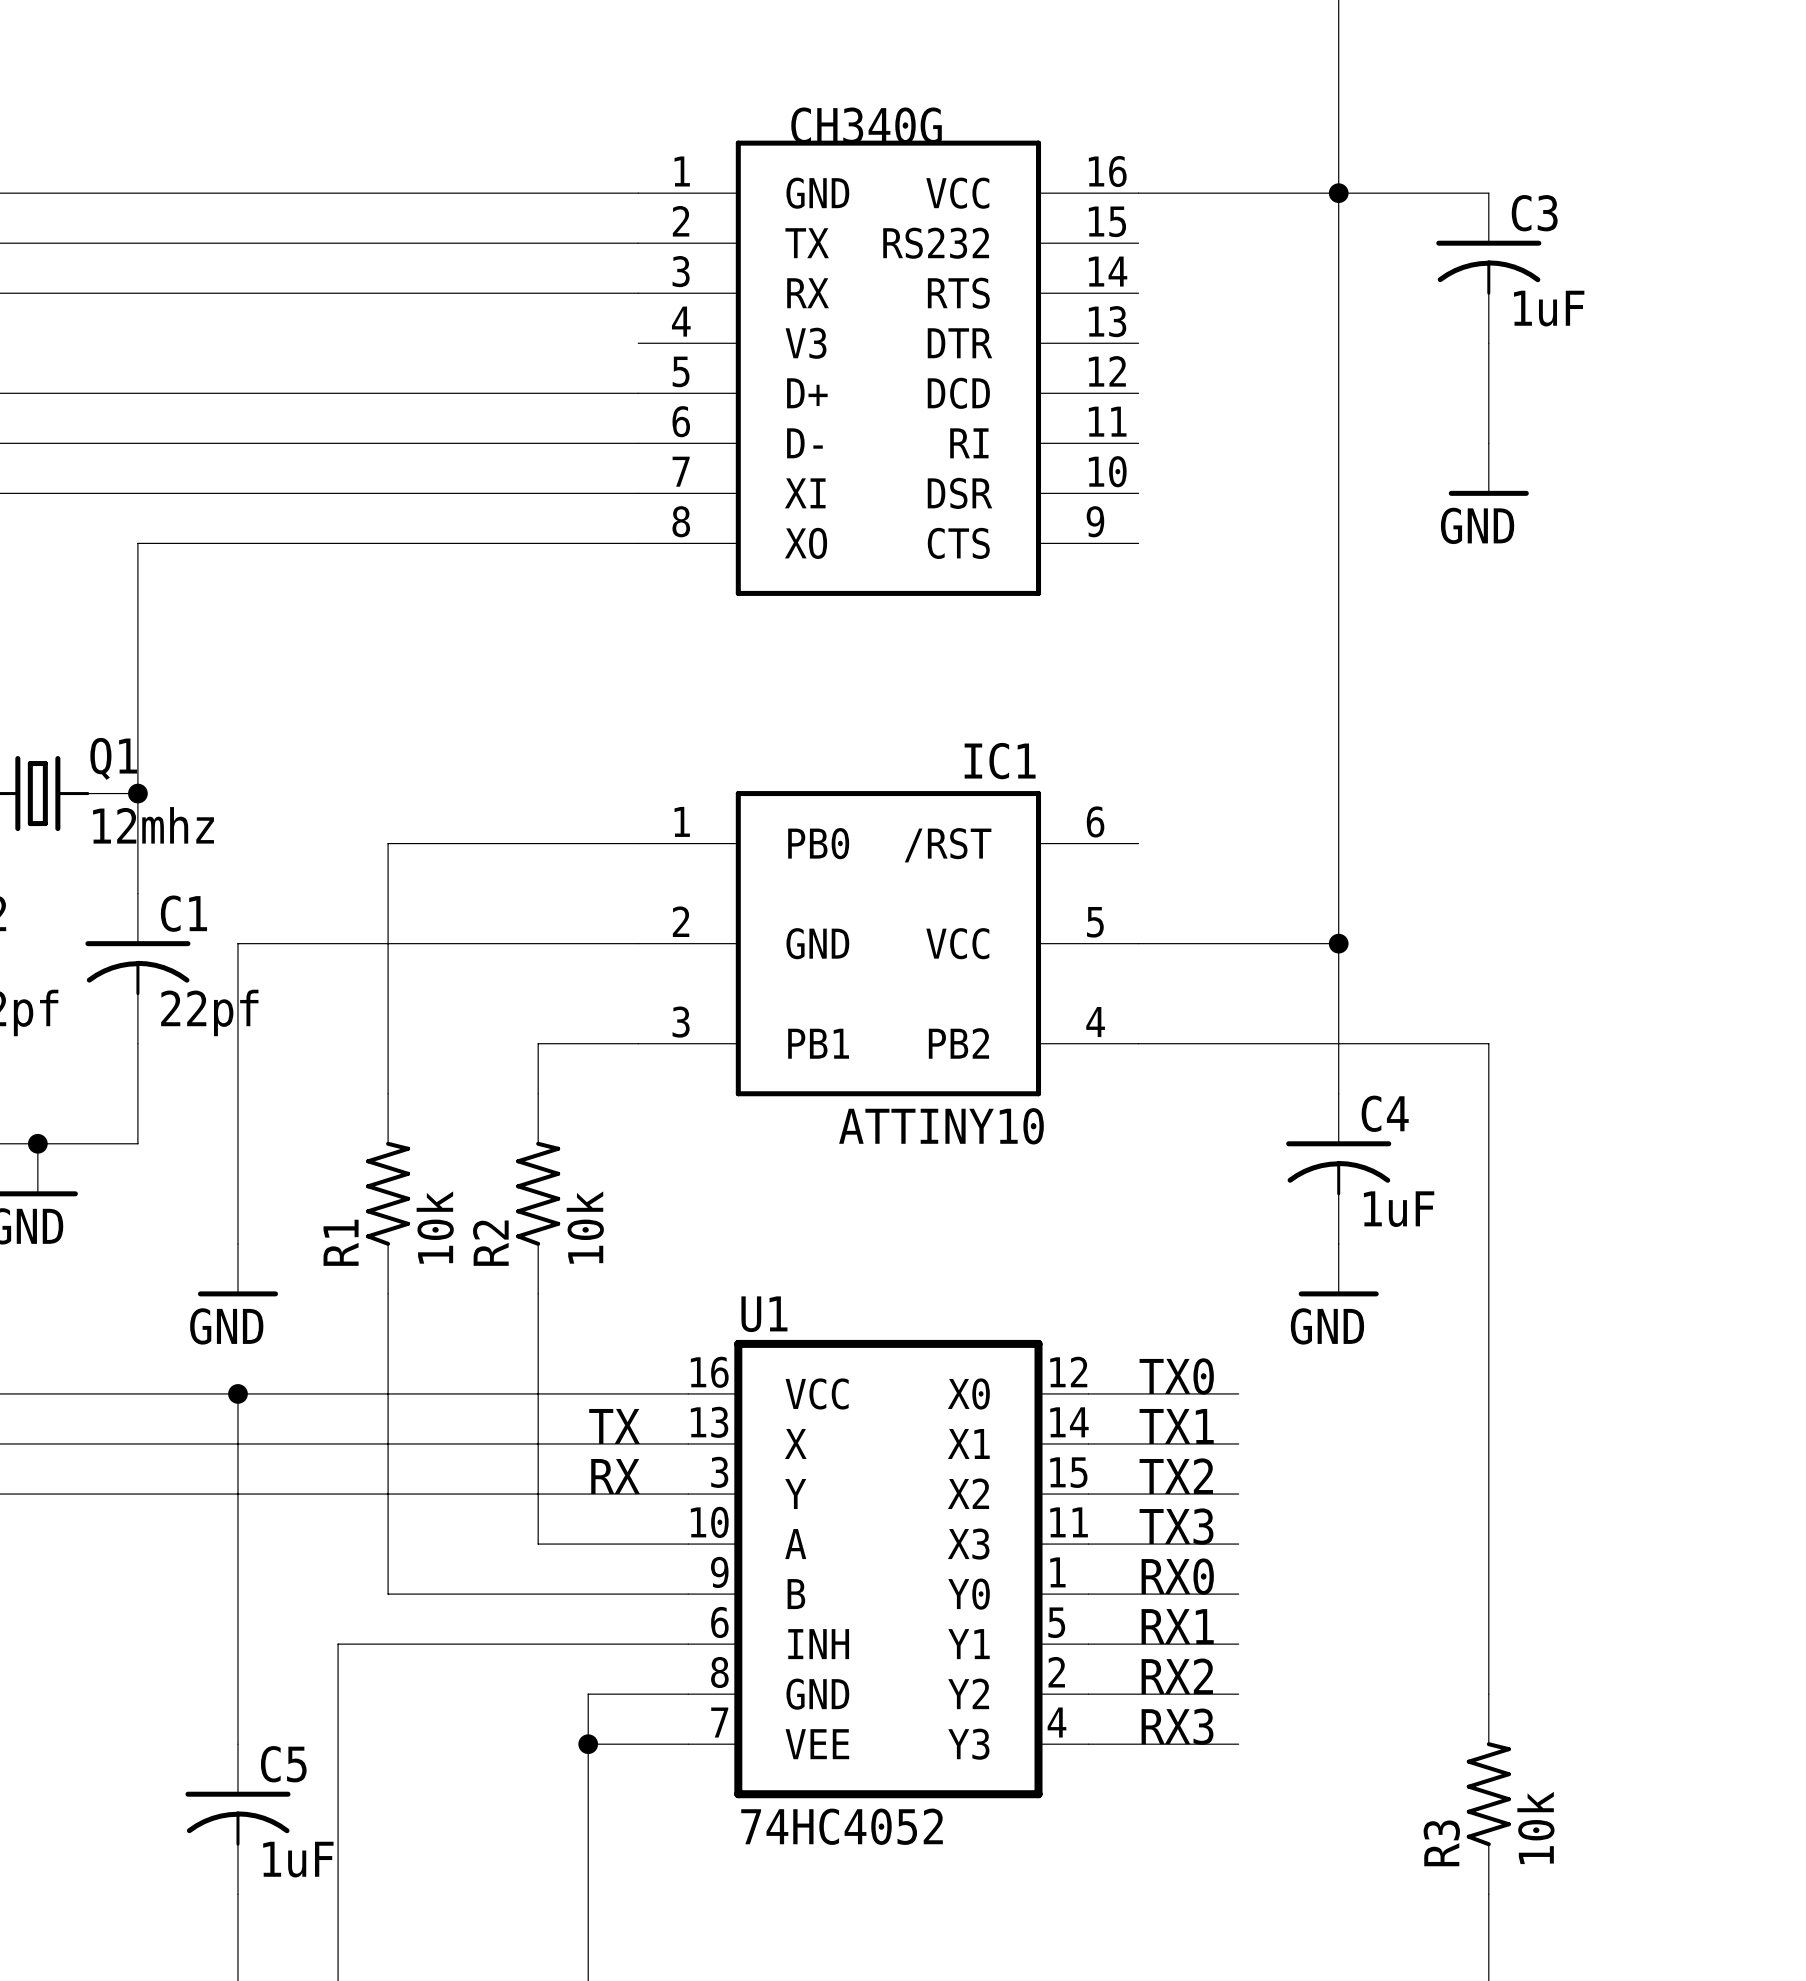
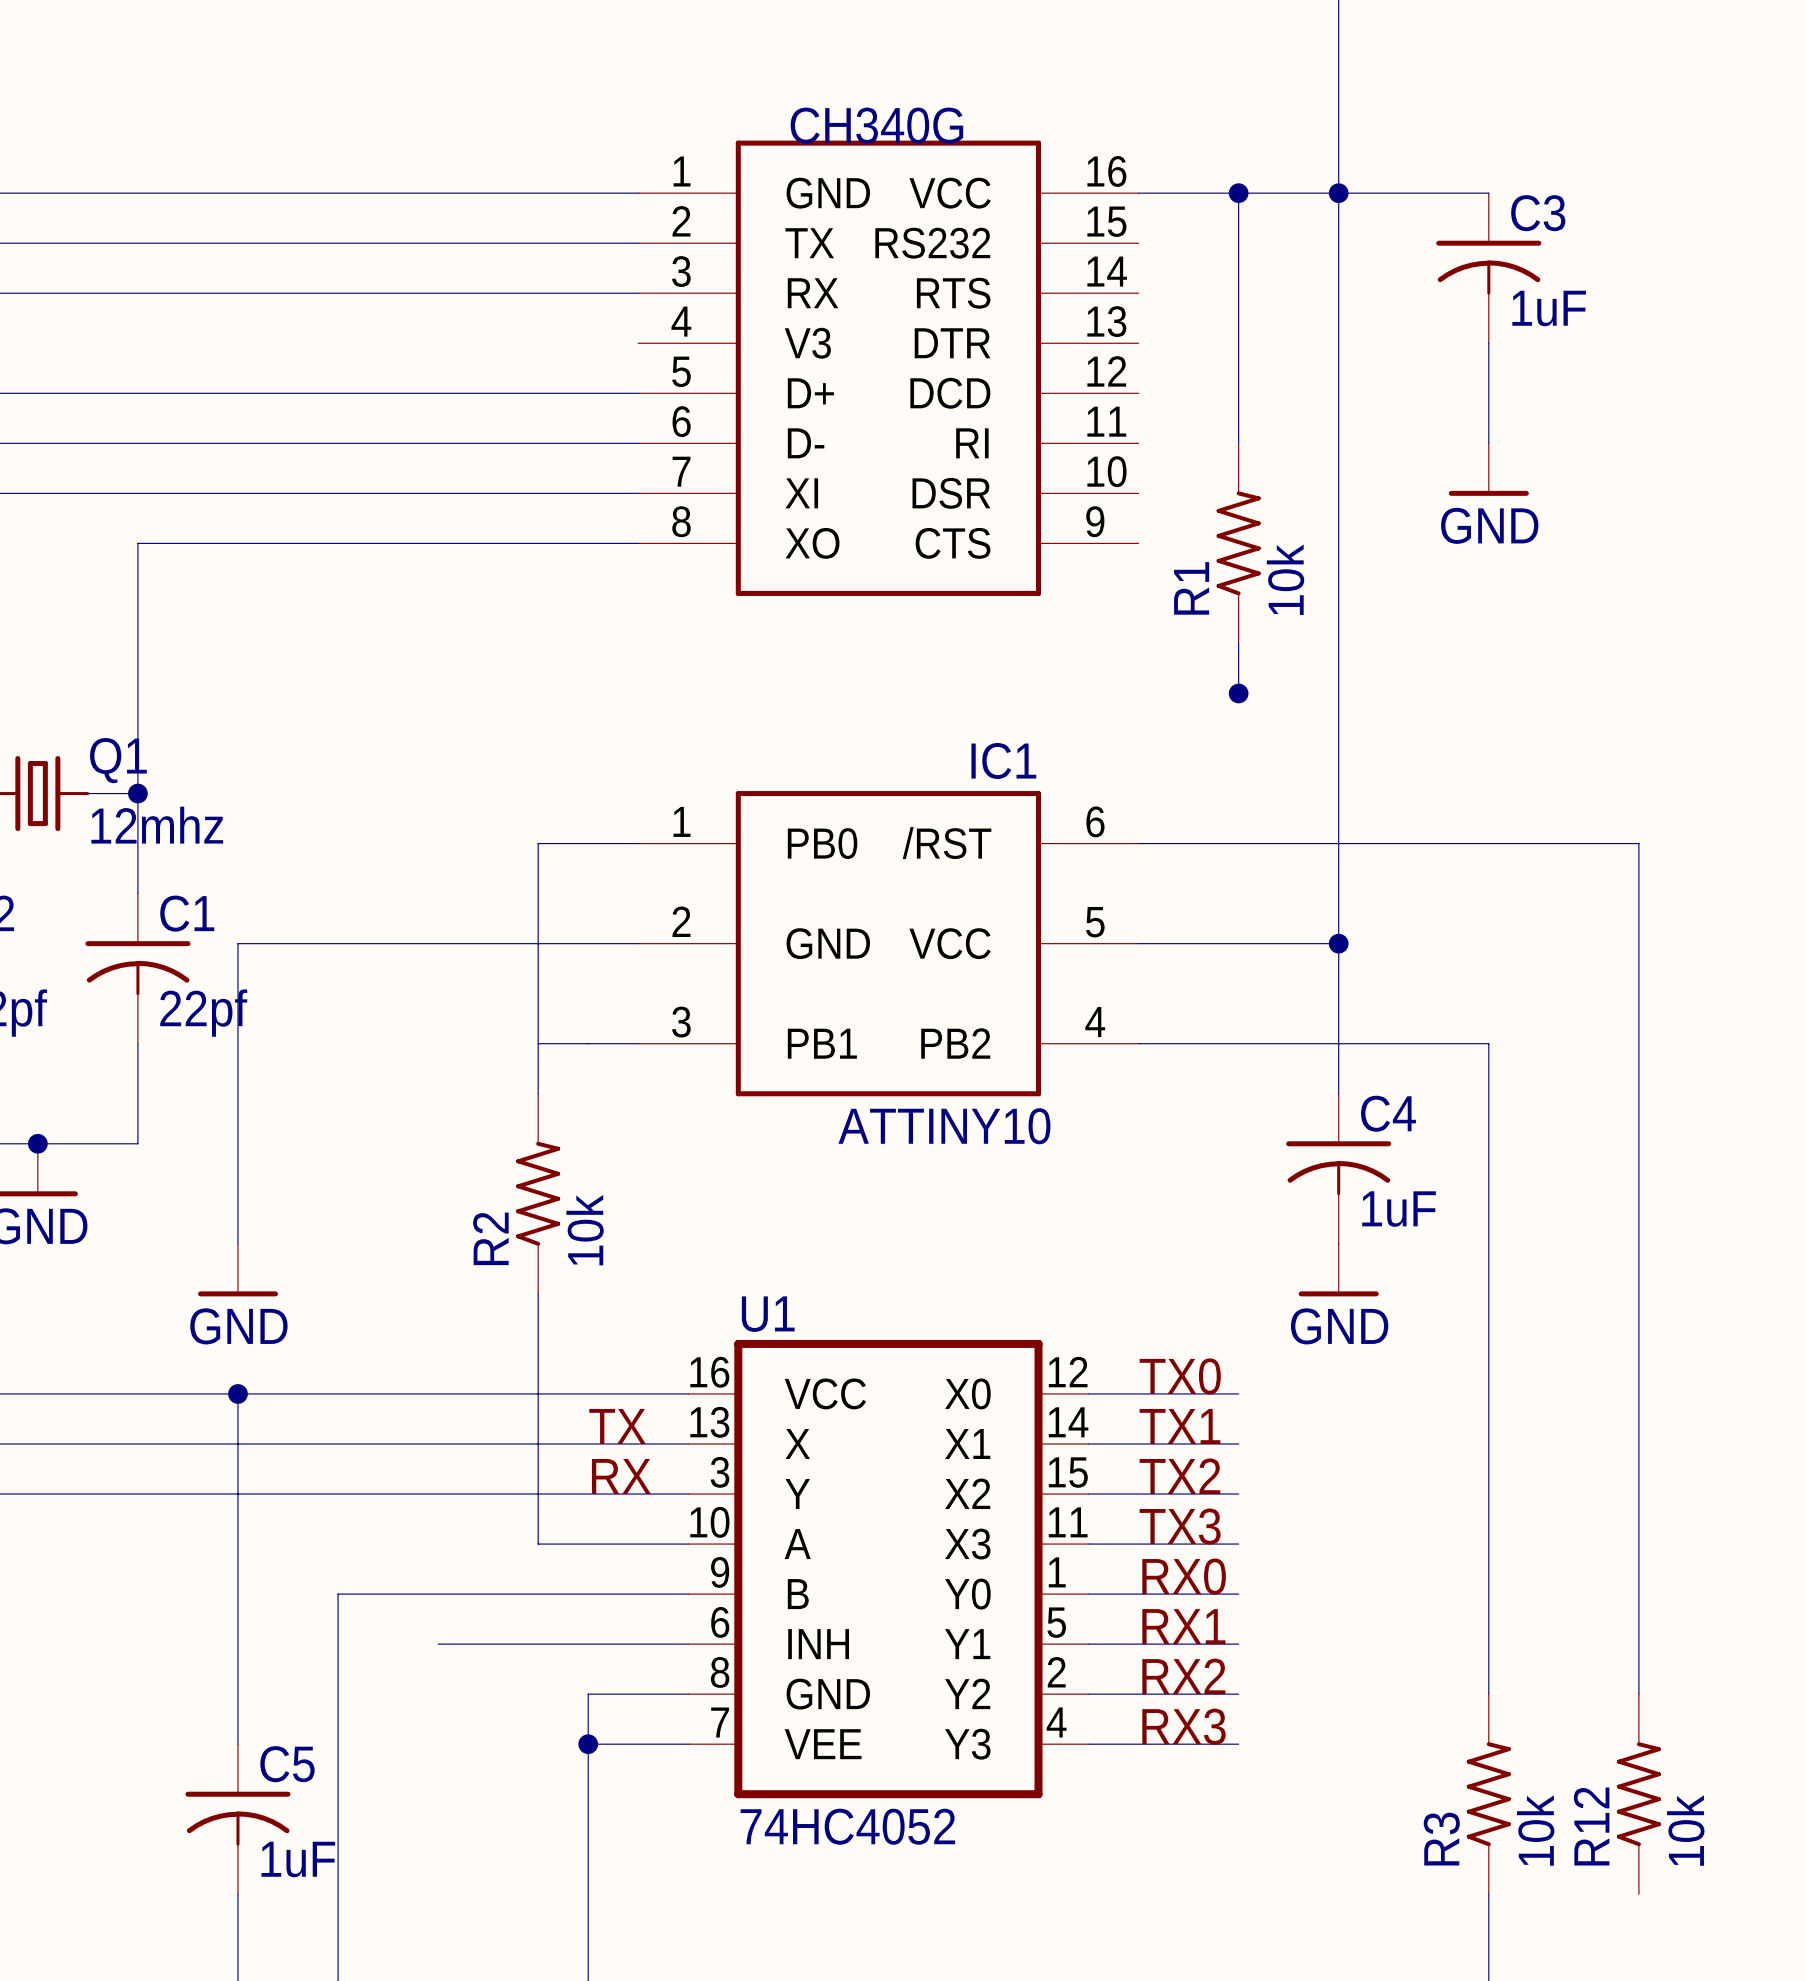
wire: none -> (1238, 193) (1238, 443)
junction: none -> (1238, 193)
wire: none -> (1238, 643) (1238, 693)
junction: none -> (1238, 693)
wire: (538, 843) (388, 843) (388, 1093) -> (538, 843) (538, 1043)
wire: none -> (1138, 843) (1638, 843) (1638, 1694)
R1 position: (388, 1193) -> (1238, 543)
wire: (388, 1293) (388, 1594) -> none
wire: (338, 1644) (438, 1644) -> (338, 1644) (338, 1594) (388, 1594)
R12: none -> 10k (1638, 1794)

